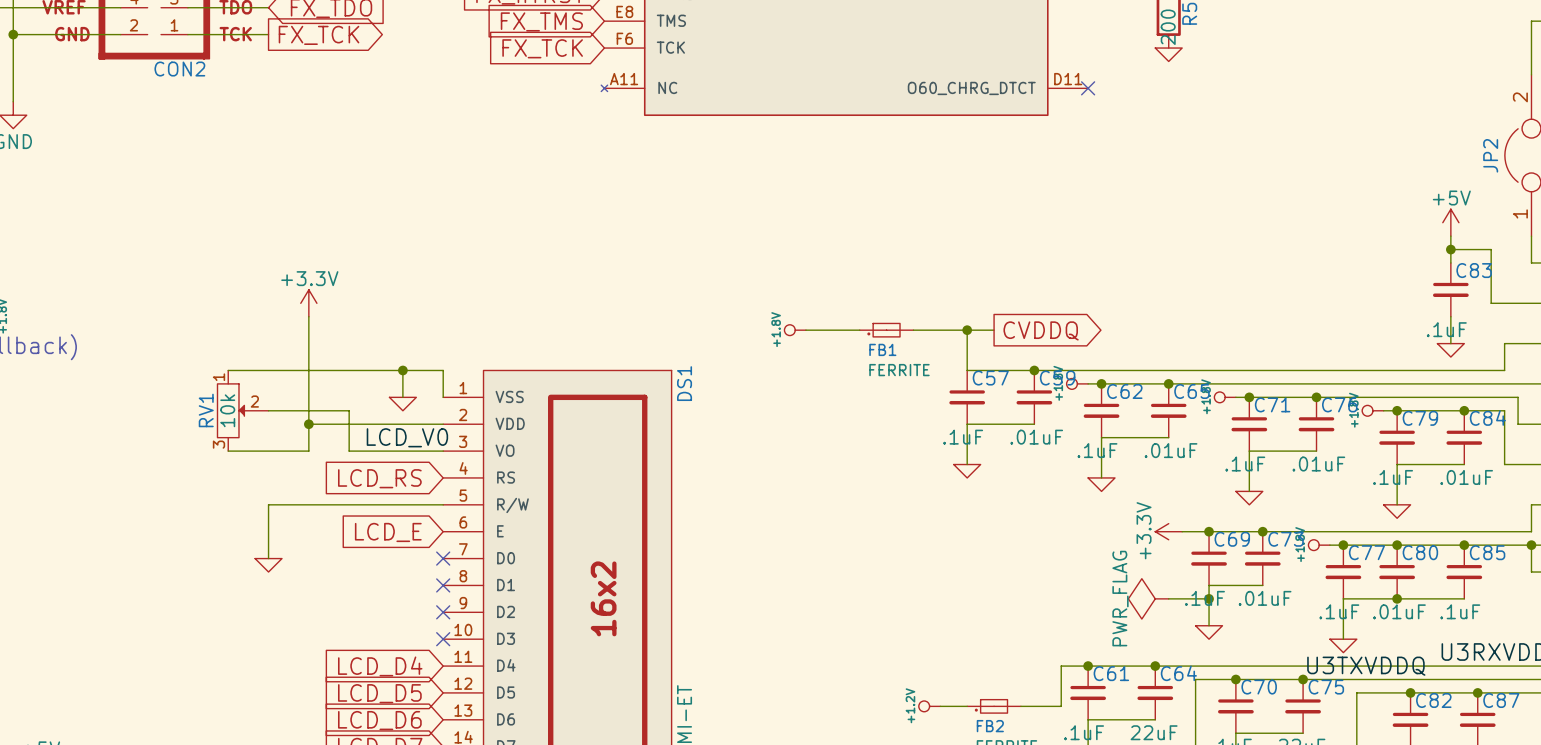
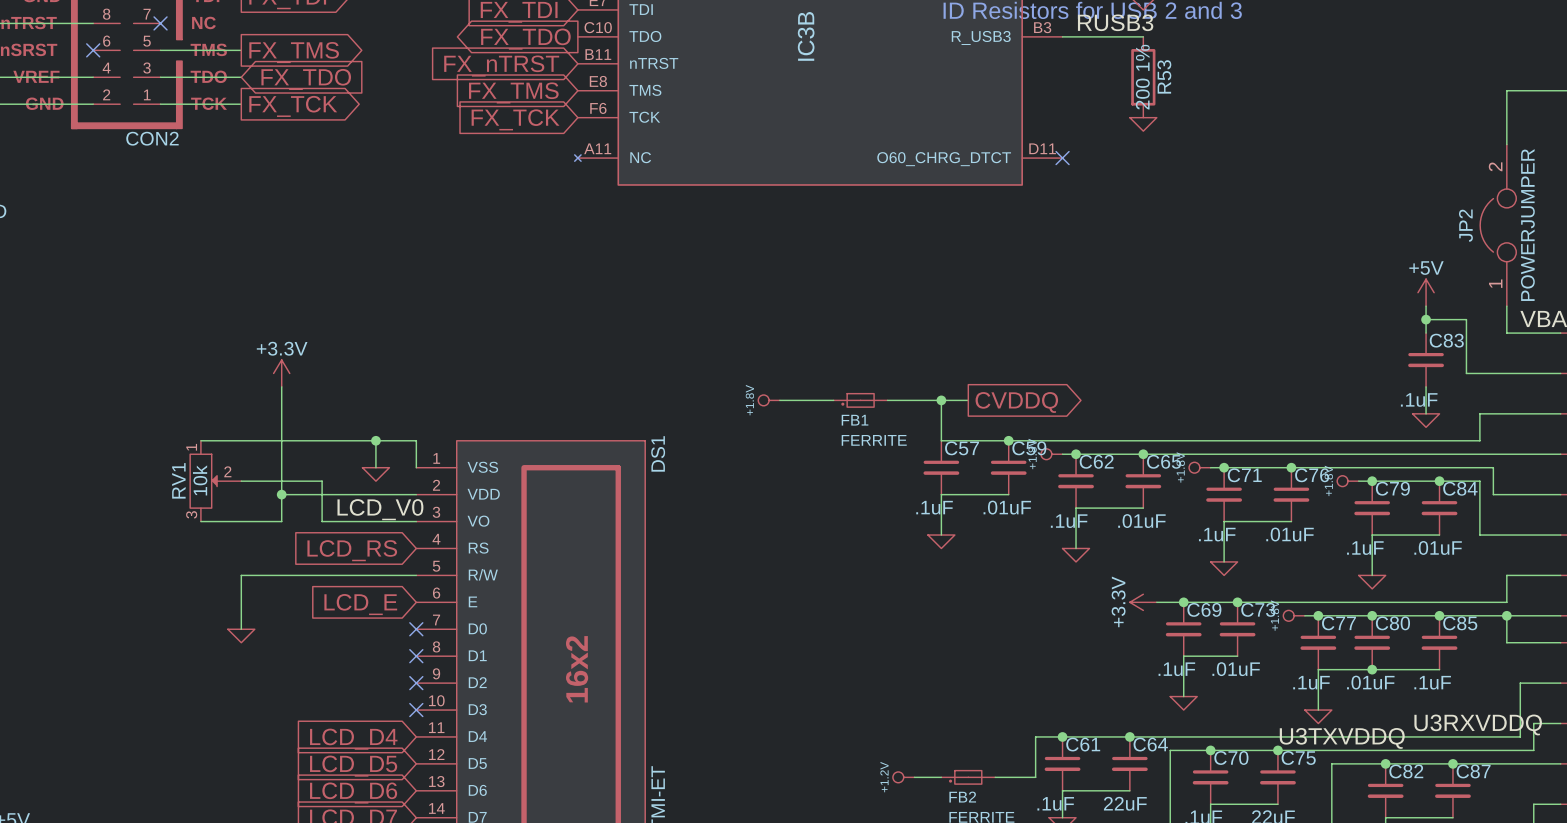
power symbol: PWR_FLAG (1148, 598) -> none
wire: (1168, 598) (1209, 598) -> none
junction: (1209, 598) -> none

